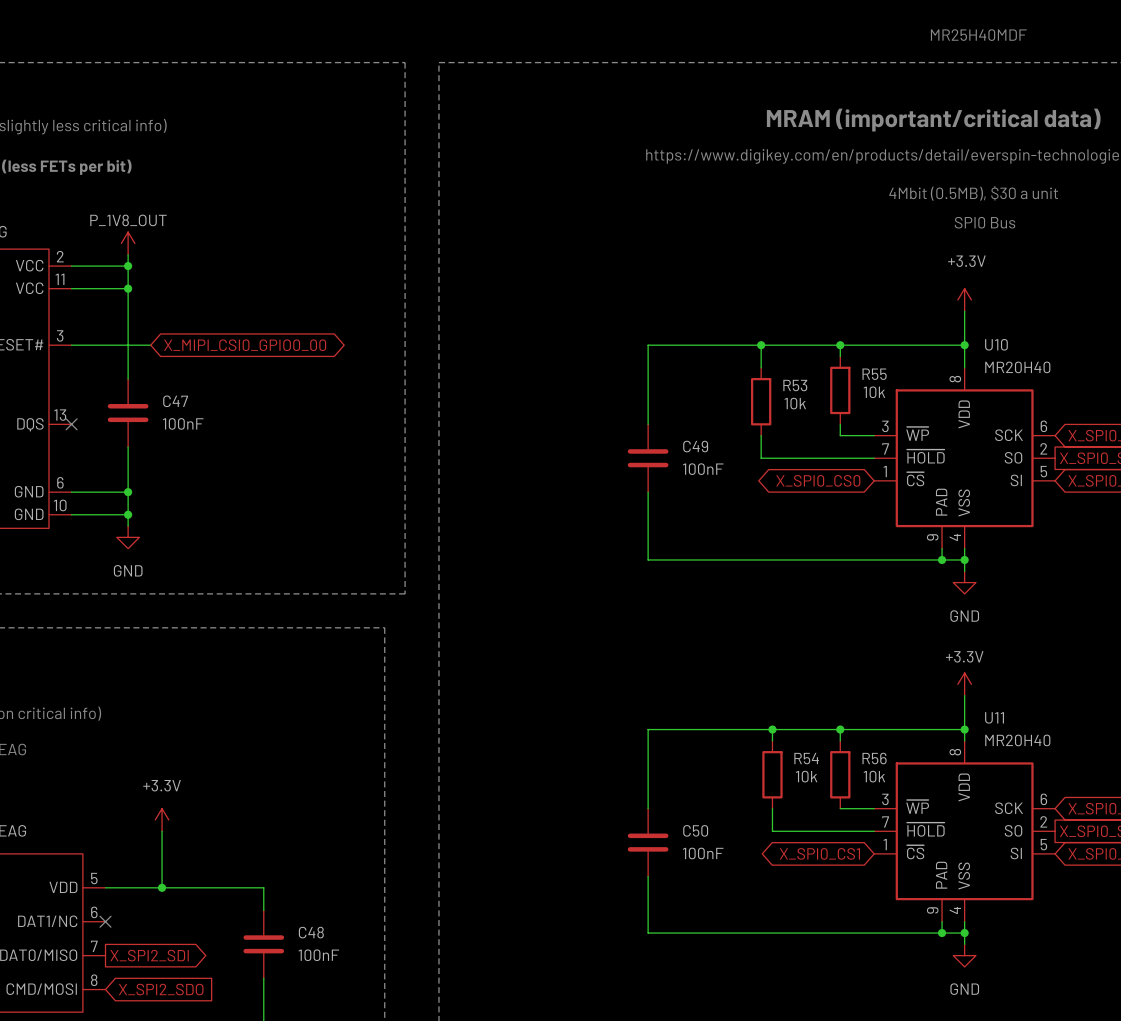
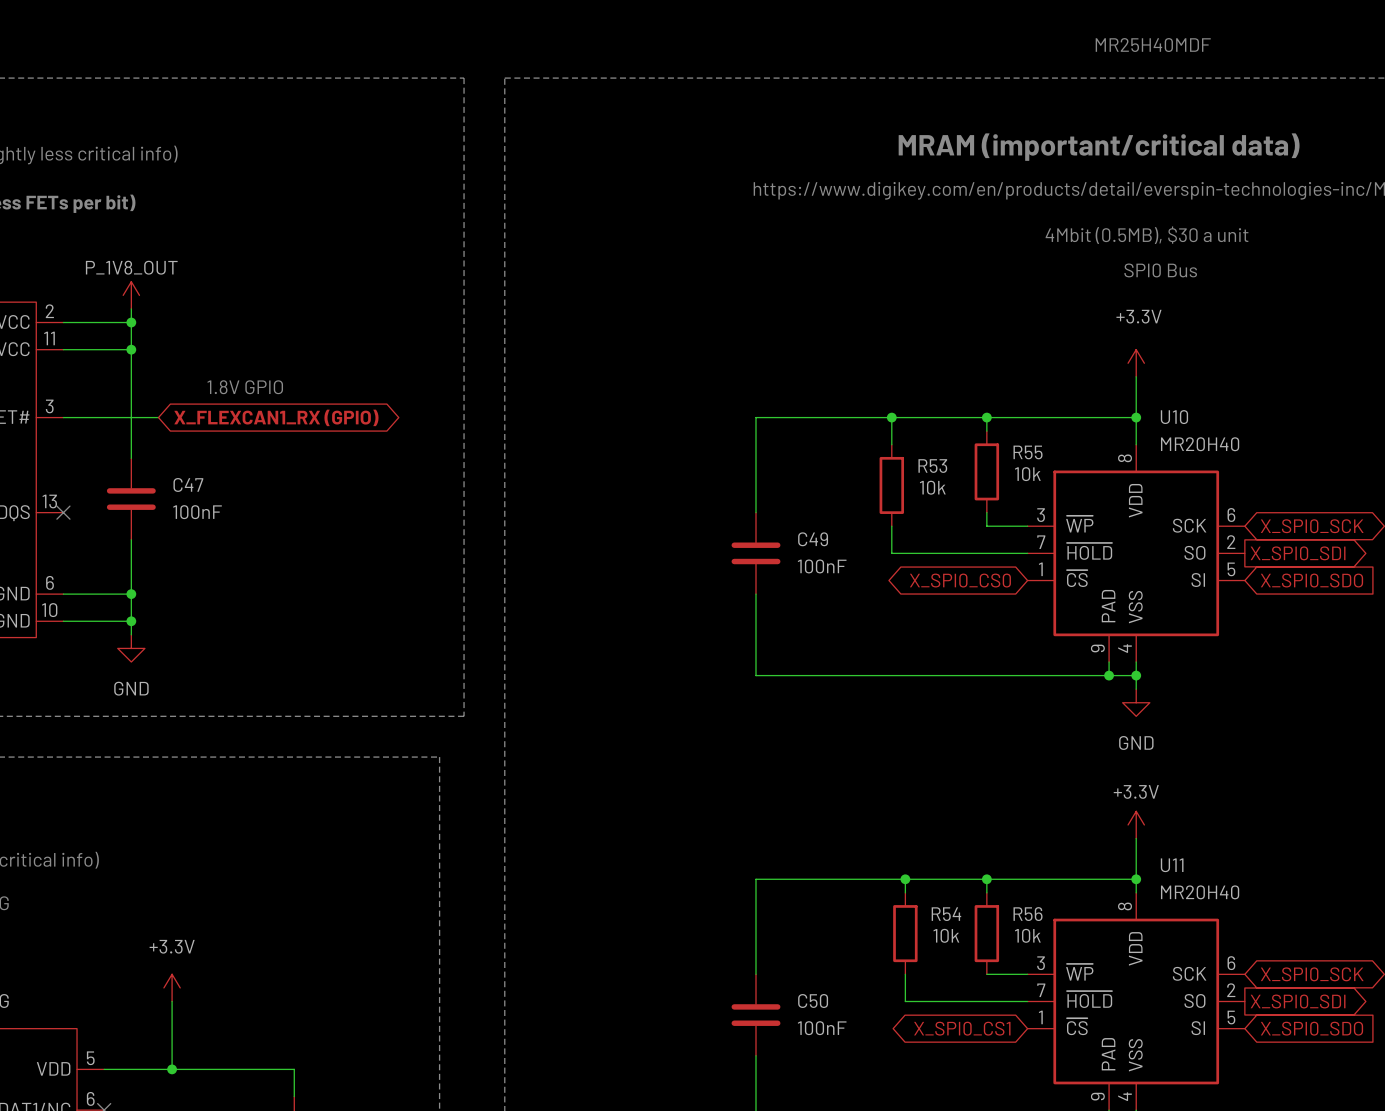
text: none -> 1.8V GPIO (245, 387)
global label: X_MIPI_CSI0_GPIO0_00 (245, 345) -> X_FLEXCAN1_RX (GPIO) (276, 417)

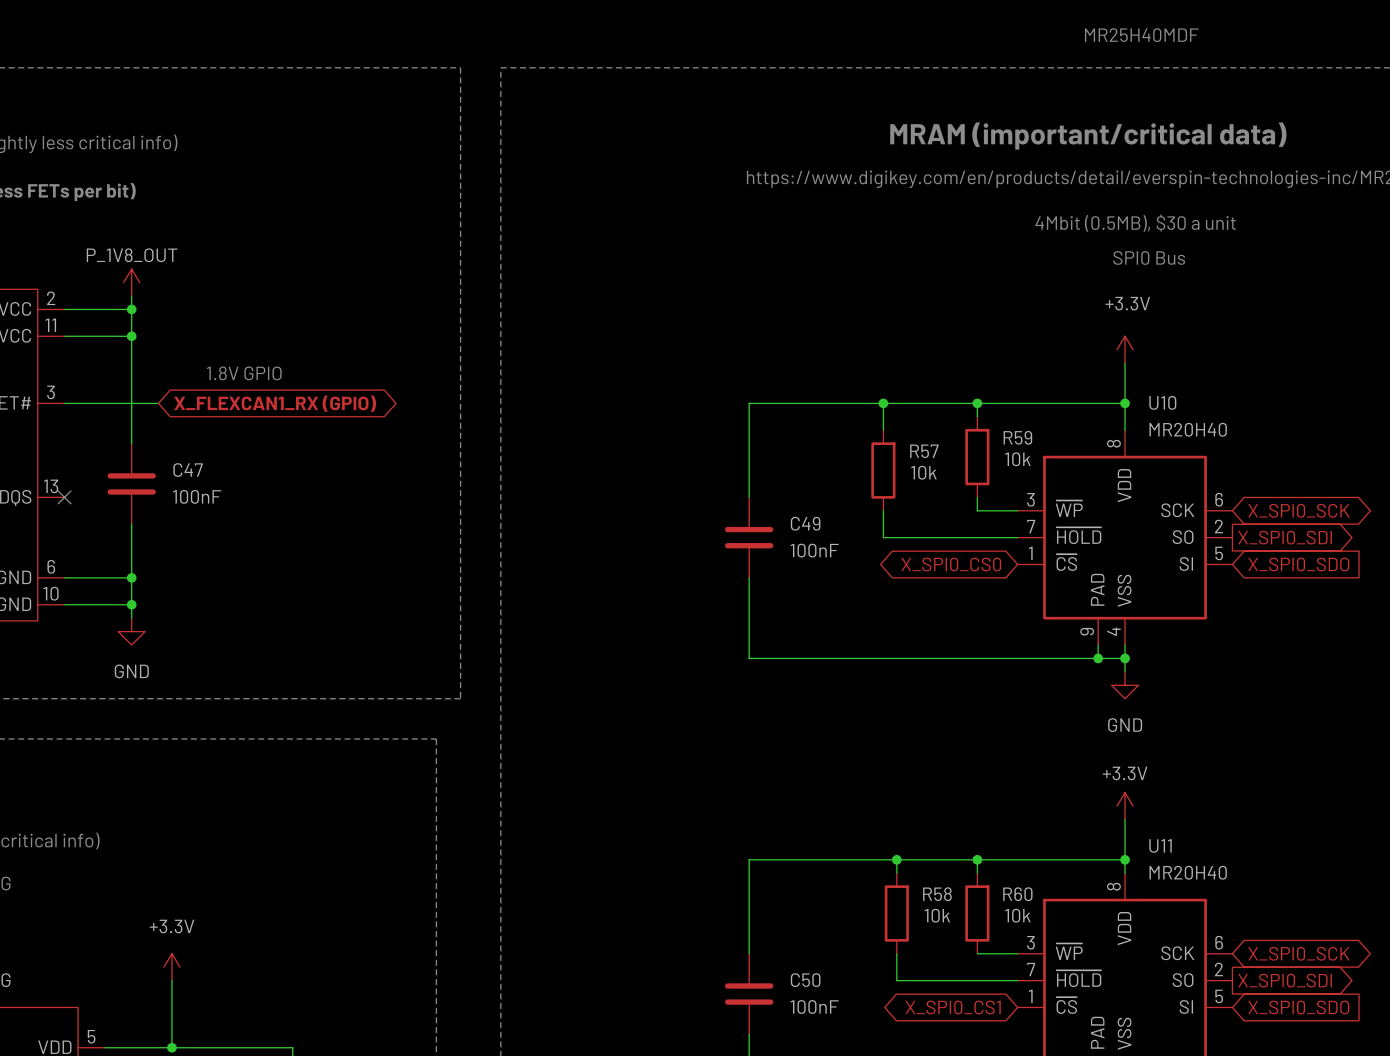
R55 name: R55 (1028, 452) -> R59 (1017, 437)
R53 name: R53 (932, 466) -> R57 (924, 451)
R54 name: R54 (946, 914) -> R58 (937, 894)
R56 name: R56 (1028, 914) -> R60 (1017, 894)

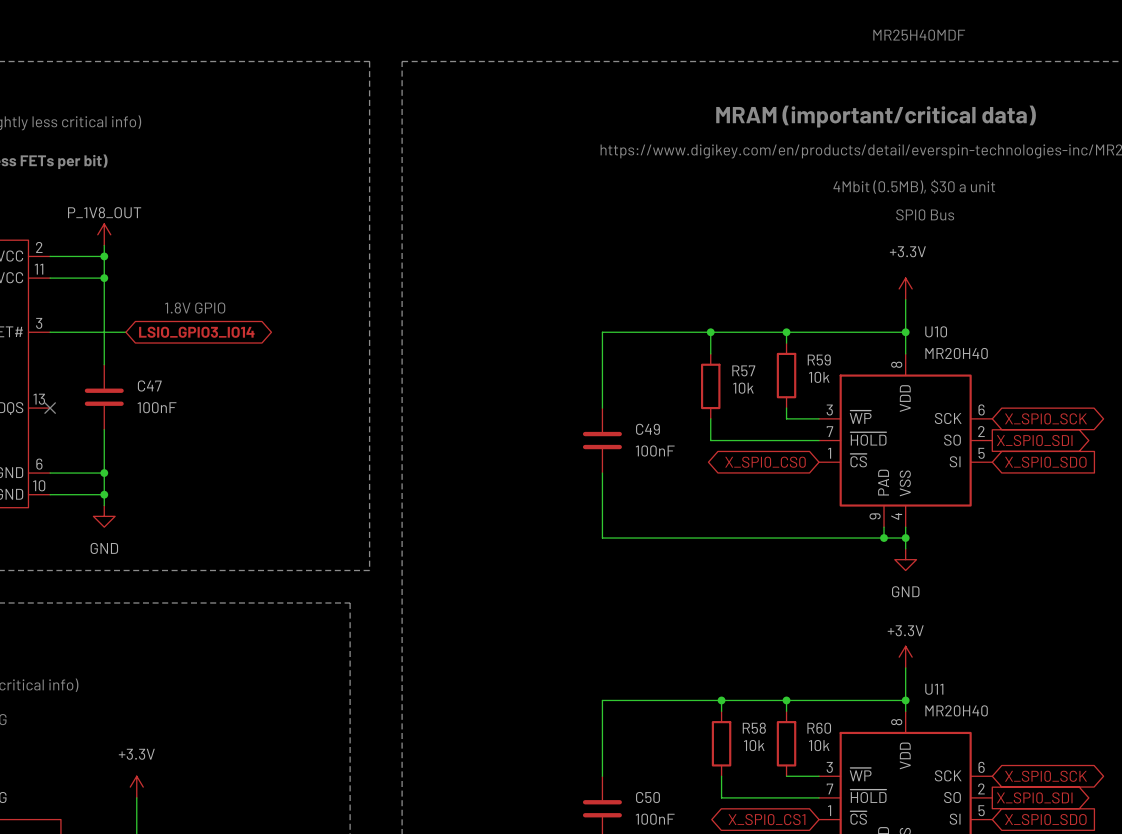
global label: X_FLEXCAN1_RX (GPIO) (275, 403) -> LSIO_GPIO3_IO14 (196, 332)

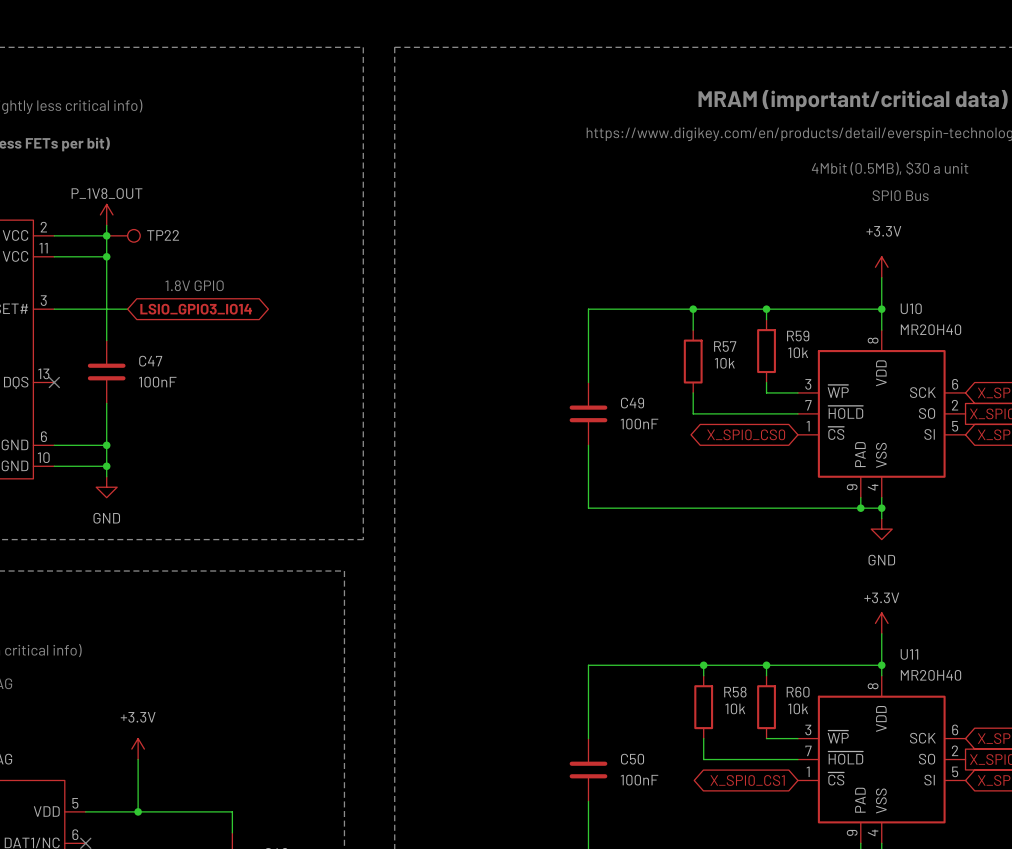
text: MR25H40MDF (919, 35) -> none
TP22: none -> (123, 235)

